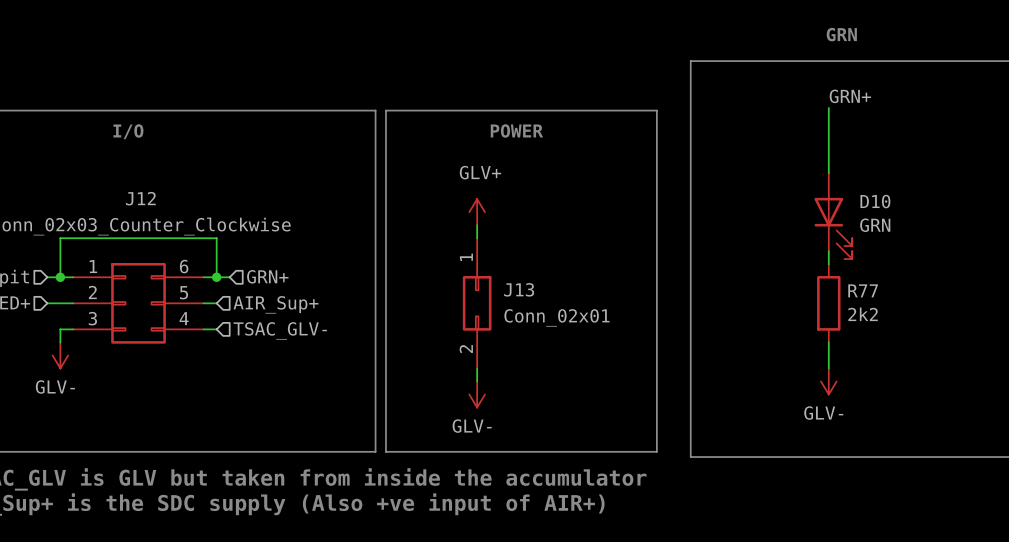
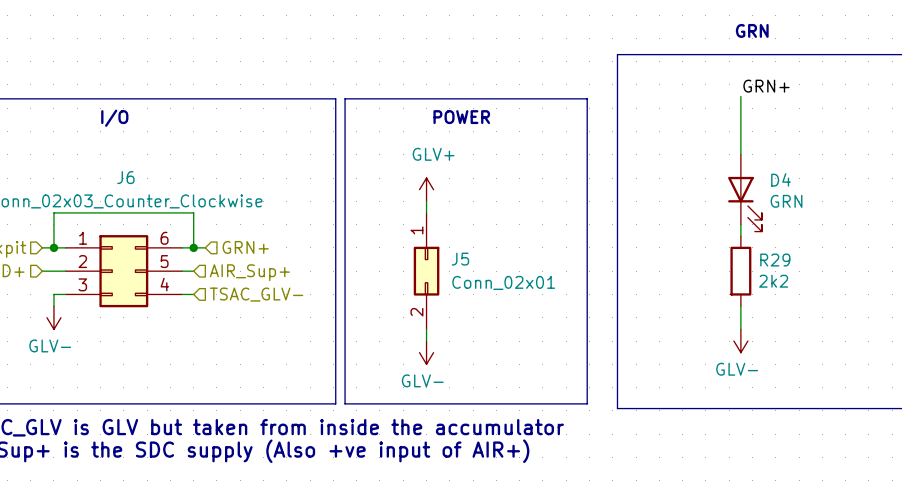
J12 name: J12 (140, 198) -> J6 (125, 177)
D10 name: D10 (875, 201) -> D4 (780, 179)
J13 name: J13 (519, 289) -> J5 (460, 259)
R77 name: R77 (863, 290) -> R29 (775, 260)

